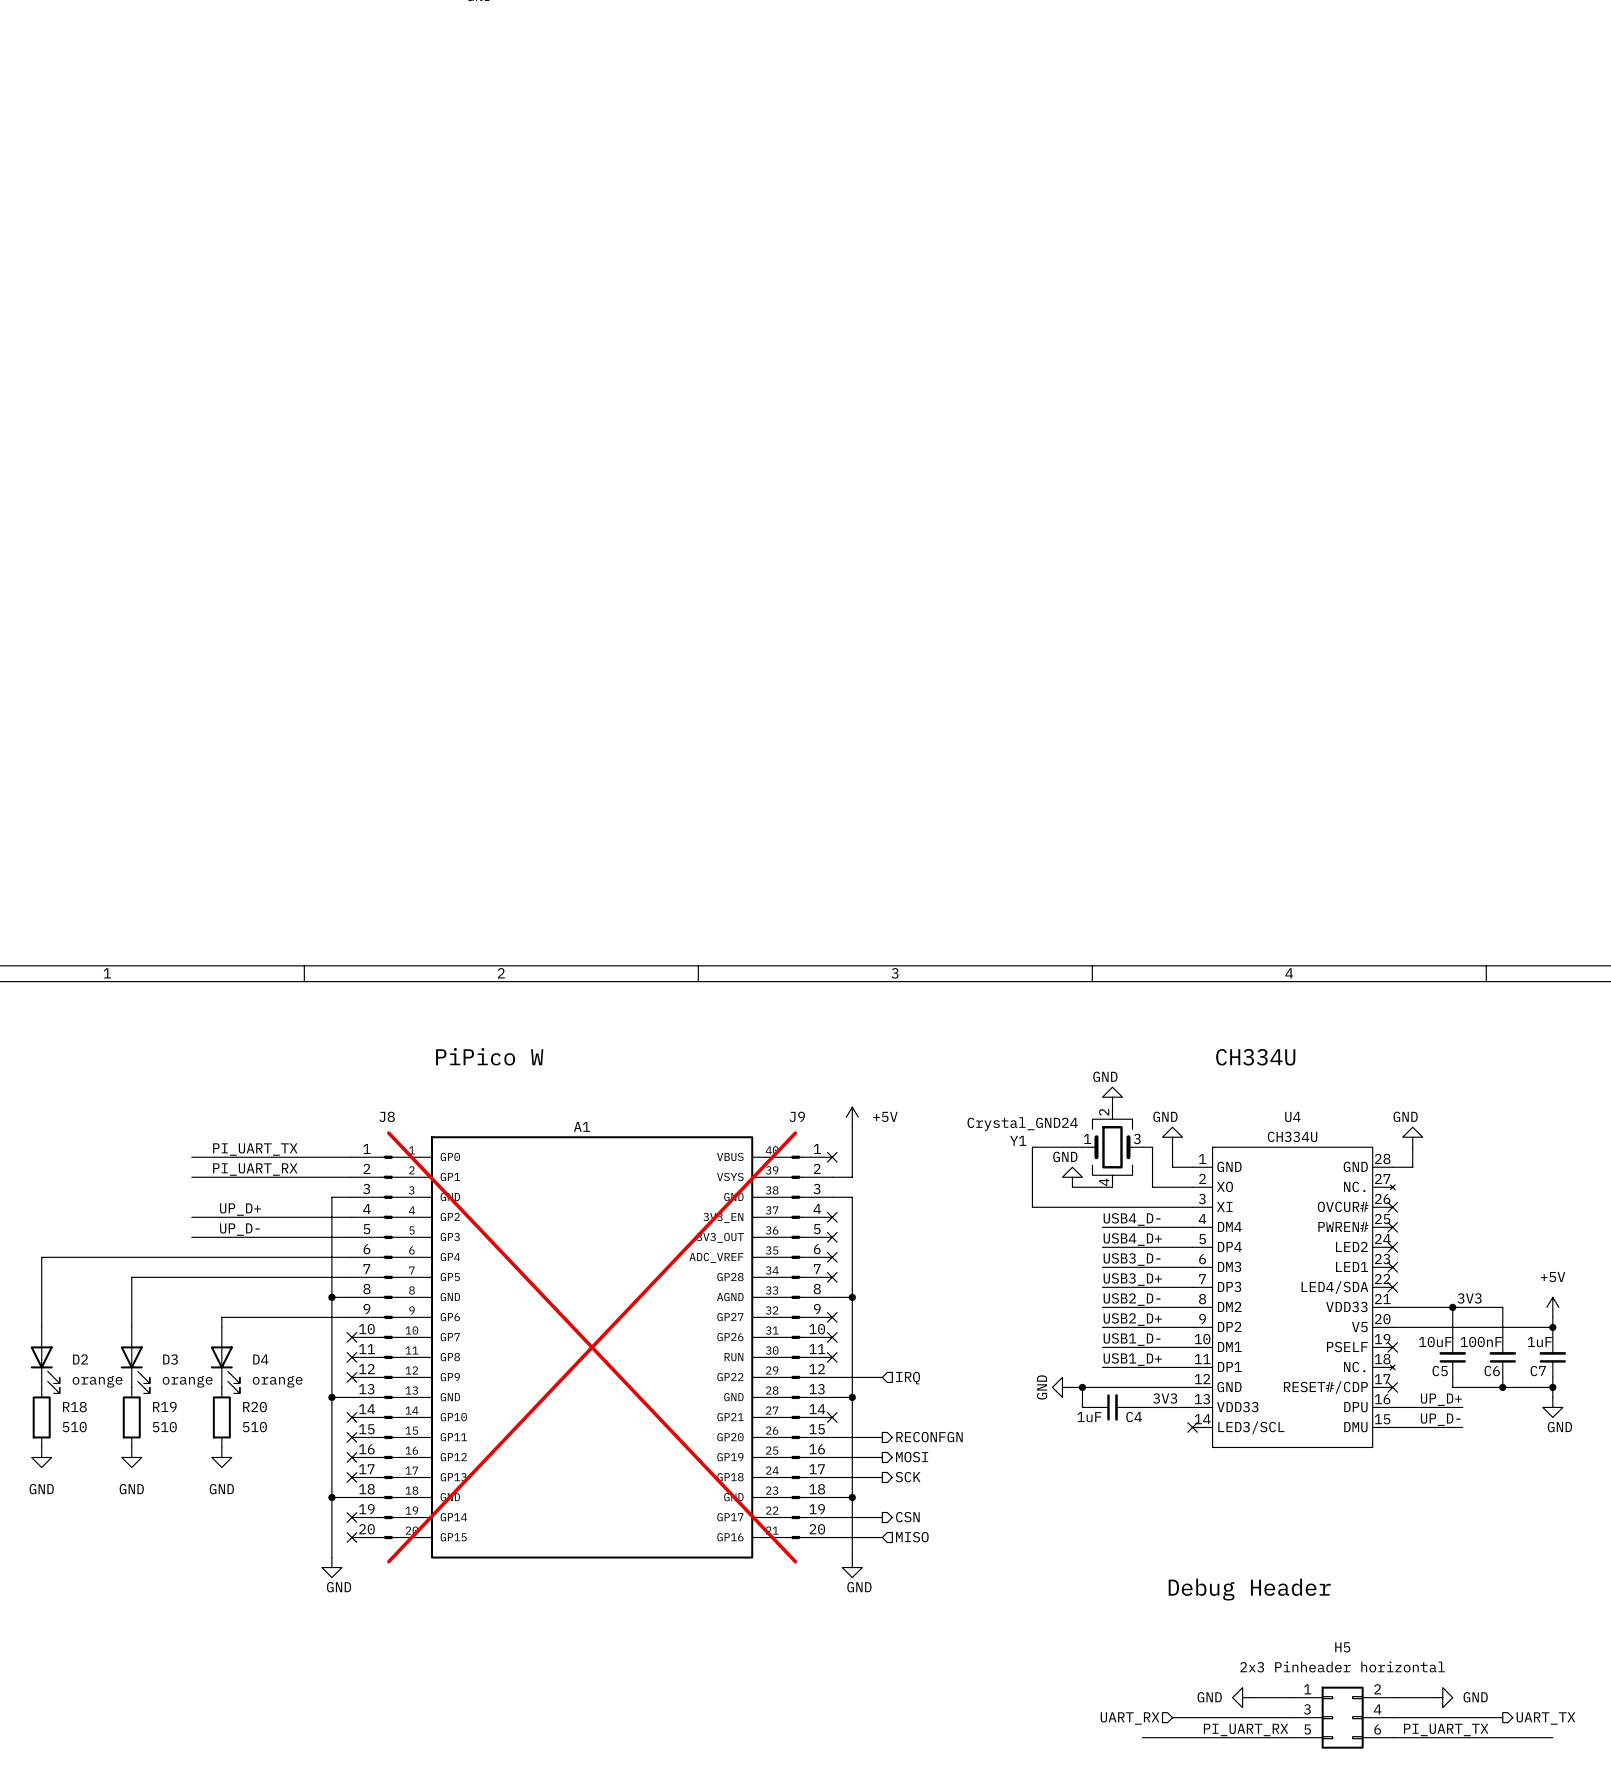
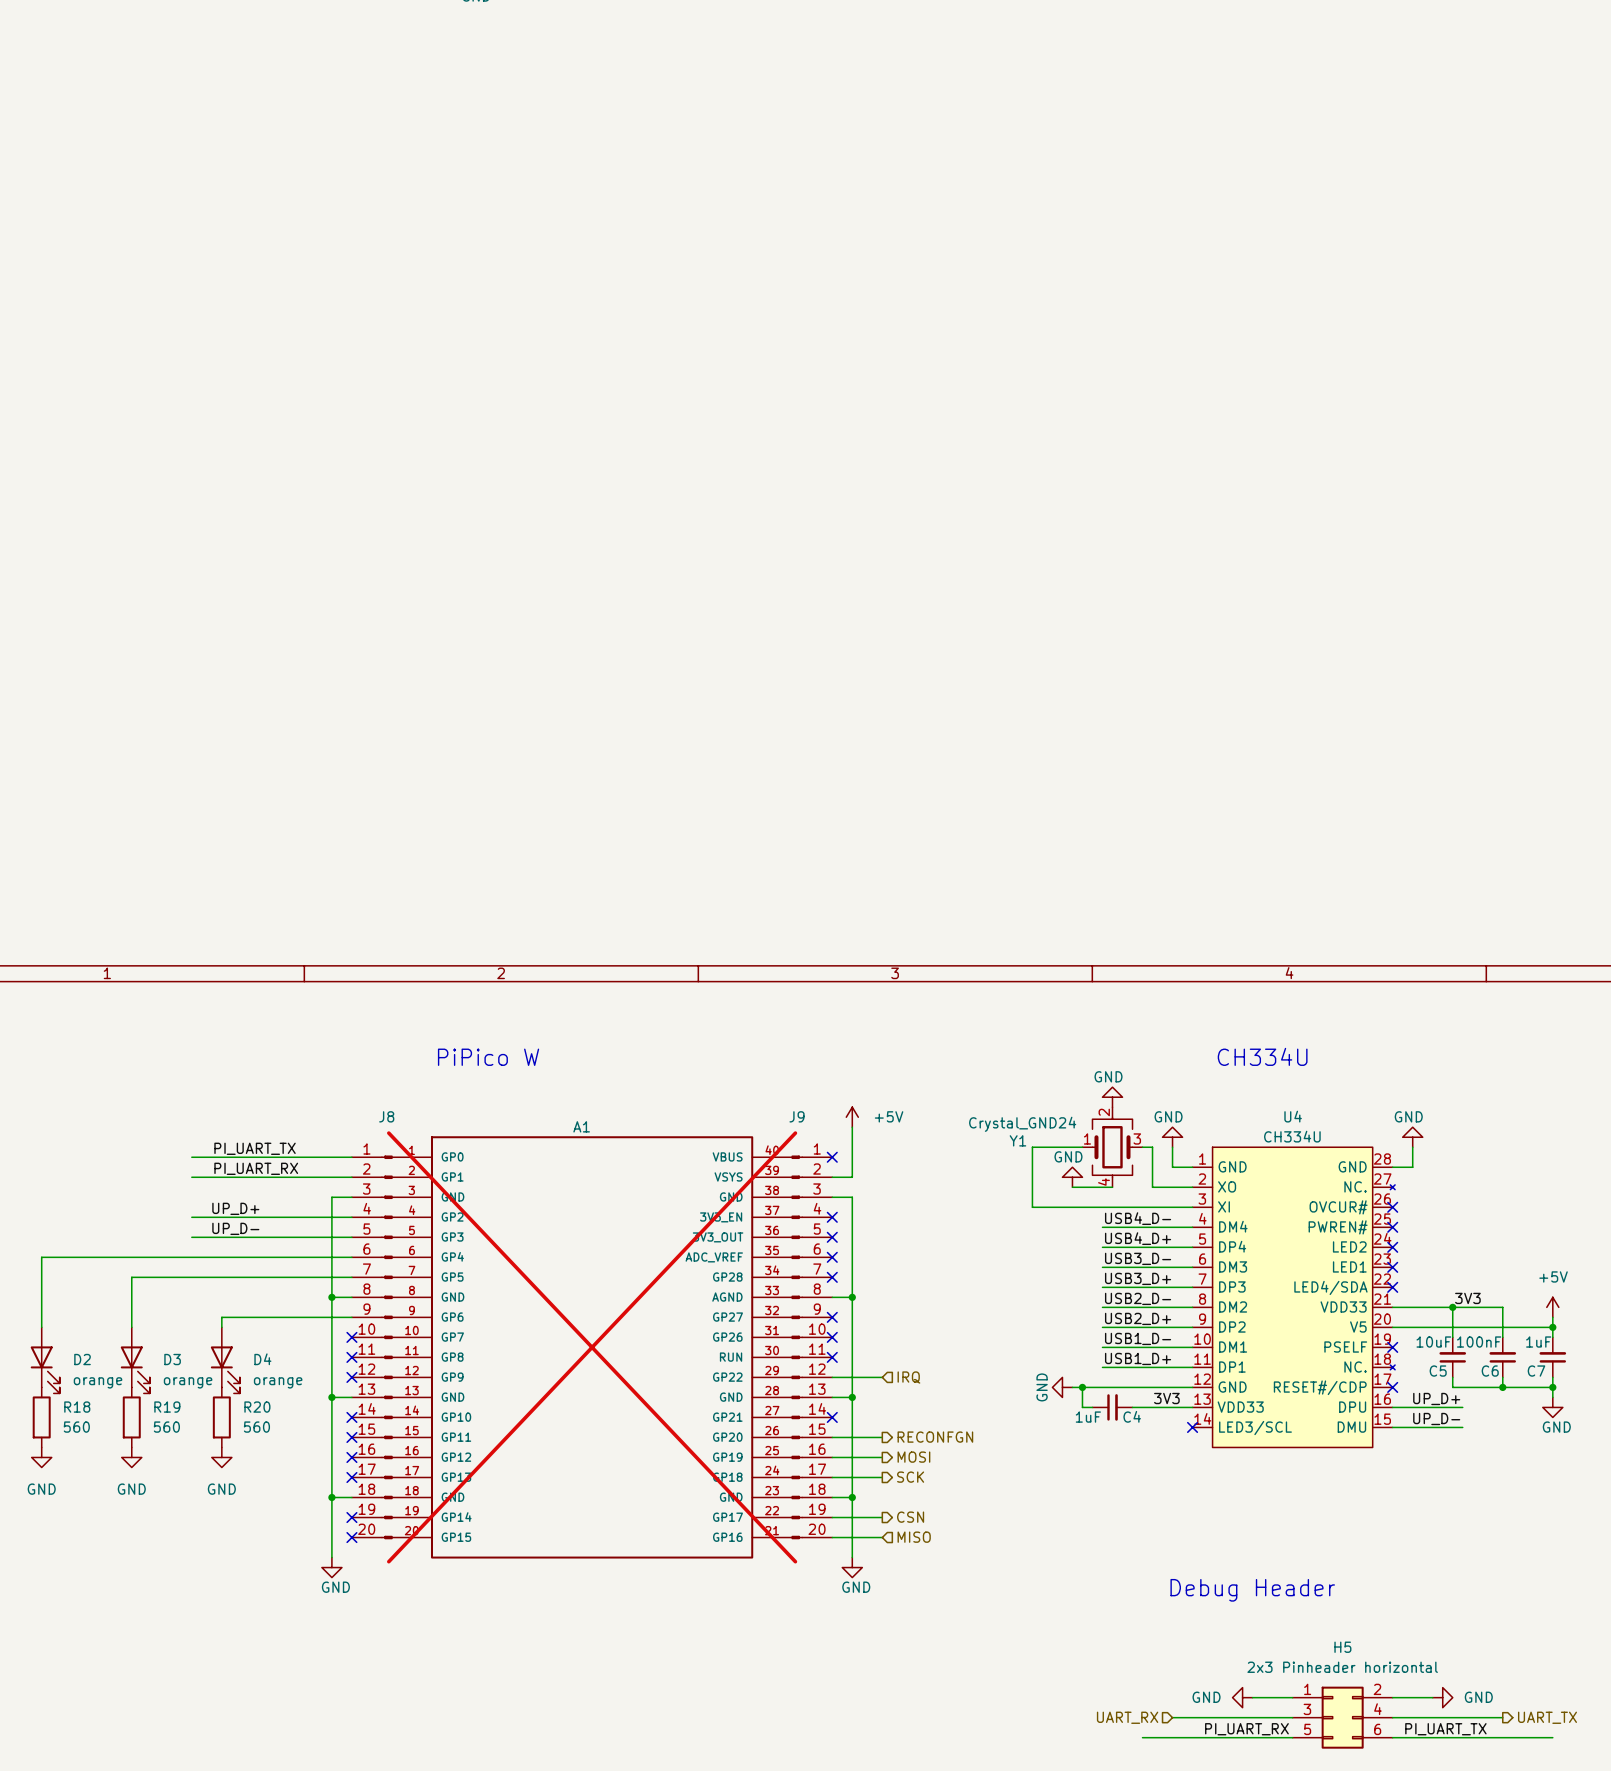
R18 value: 510 (74, 1427) -> 560 (76, 1427)
R19 value: 510 (164, 1427) -> 560 (166, 1427)
R20 value: 510 (254, 1427) -> 560 (256, 1427)

